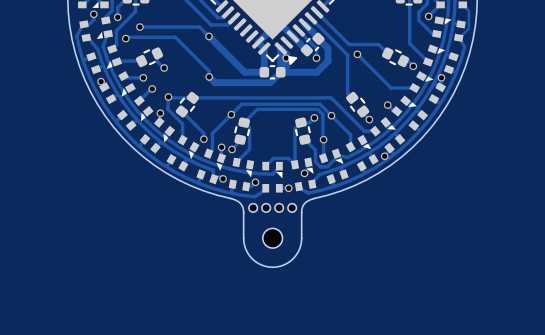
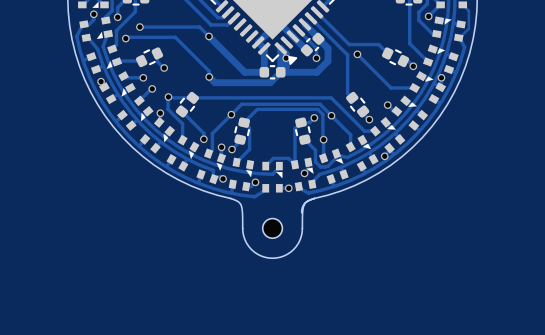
board edge: (230, 198) (240, 203) (243, 212) -> (230, 198) (241, 205) (242, 232) (248, 246) (261, 255) (272, 258) (283, 255) (296, 246) (302, 232) (303, 205) (314, 198)
part footprint: [243, 203, 303, 268] -> [262, 218, 283, 239]

